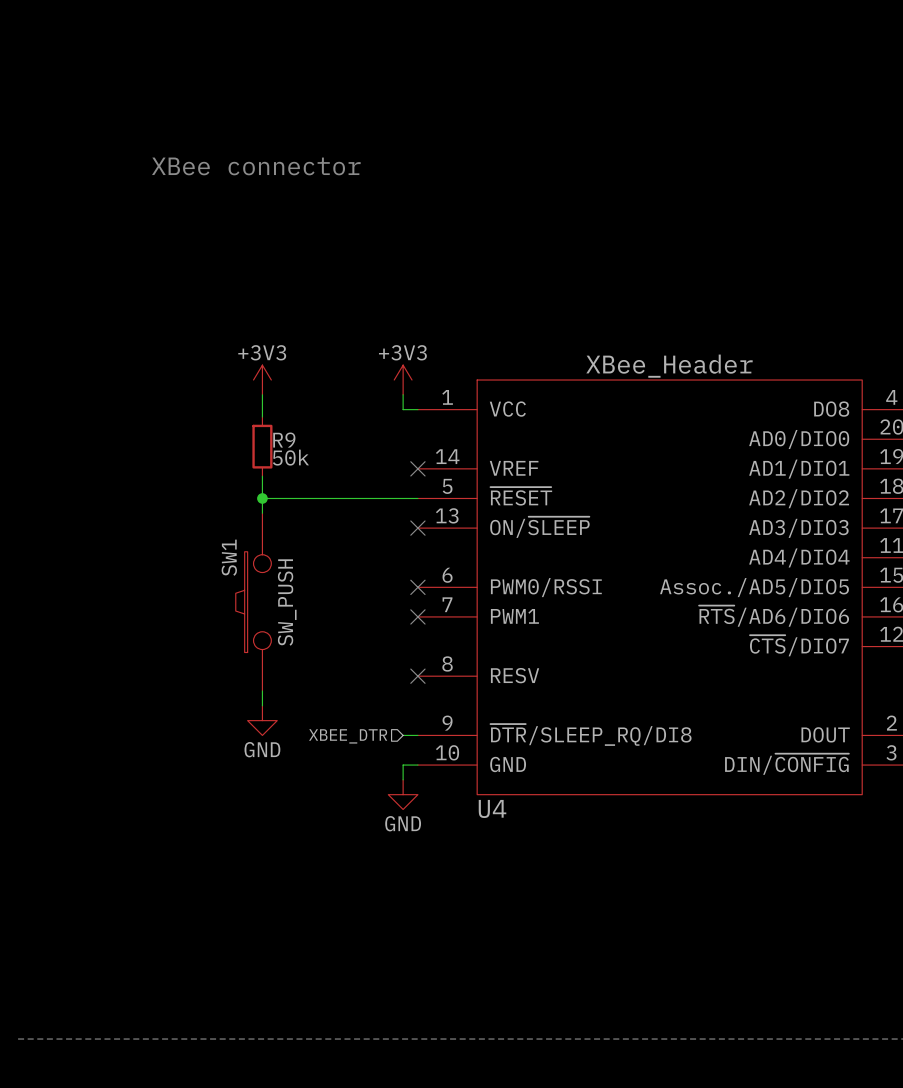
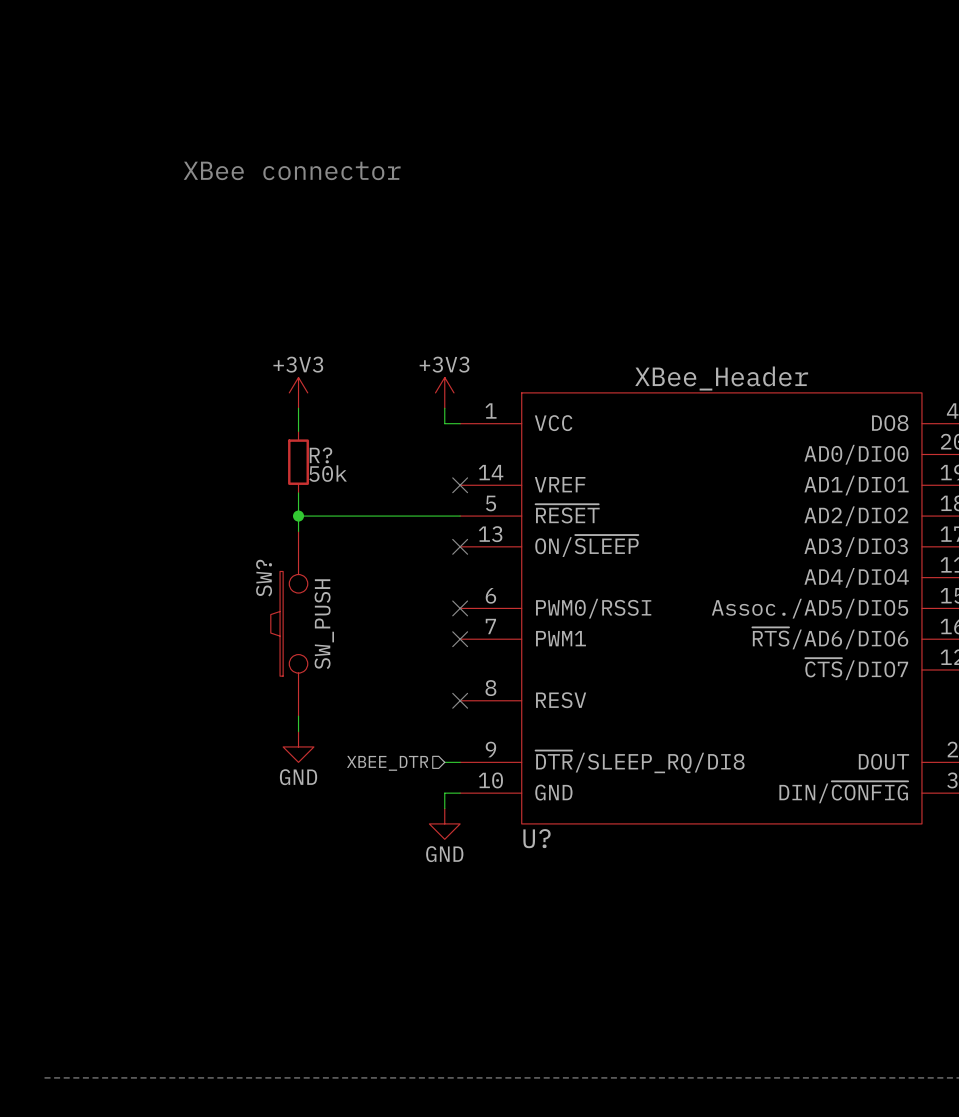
R9 name: R9 (284, 440) -> R? (320, 455)
SW1 name: SW1 (229, 557) -> SW? (264, 578)
U4 name: U4 (492, 808) -> U? (536, 838)

